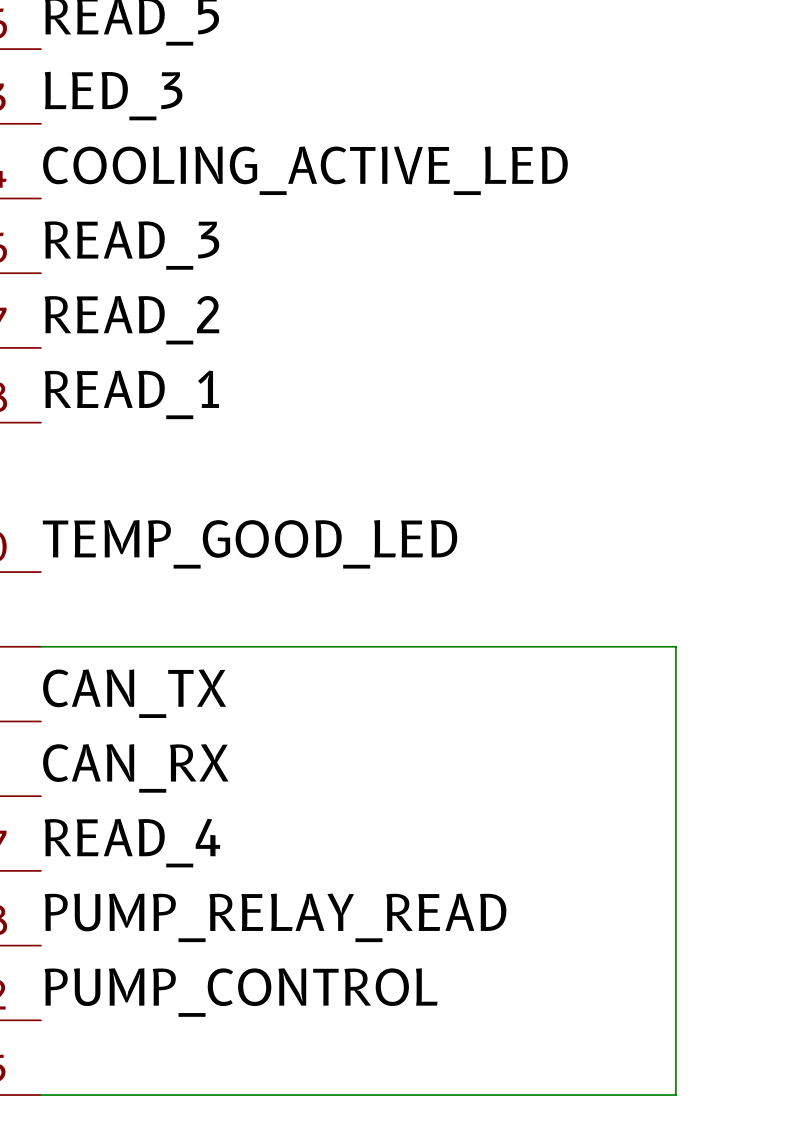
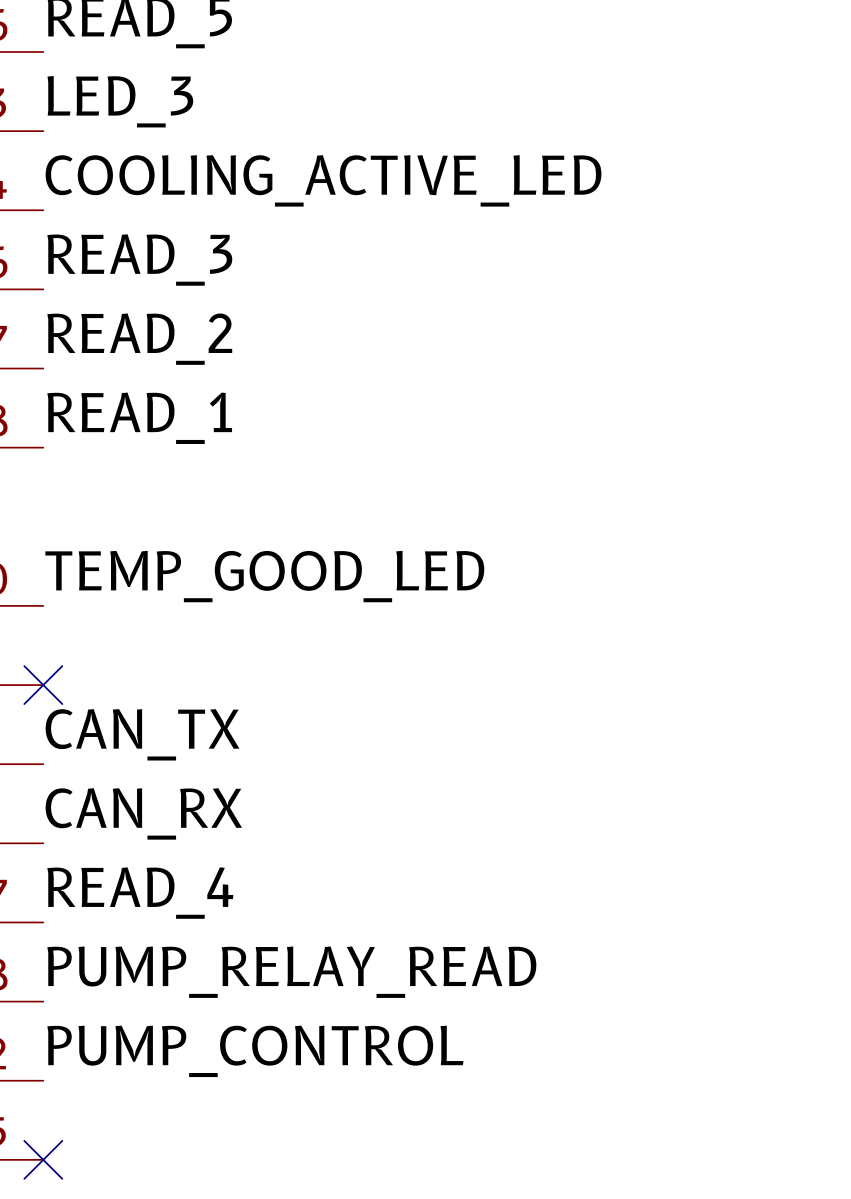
wire: (40, 646) (675, 646) (675, 1095) (40, 1095) -> none
no-connect mark: none -> (43, 685)
no-connect mark: none -> (43, 1159)

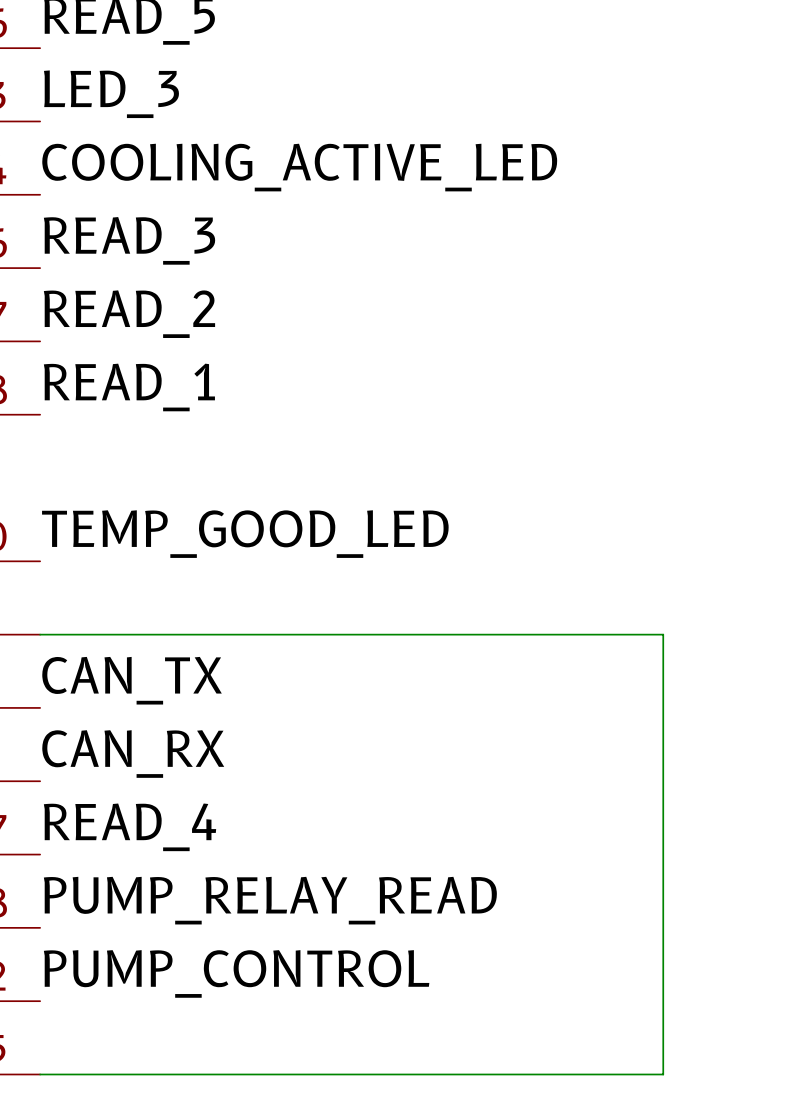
wire: none -> (40, 634) (663, 634) (663, 1074) (40, 1074)
no-connect mark: (43, 685) -> none
no-connect mark: (43, 1159) -> none

